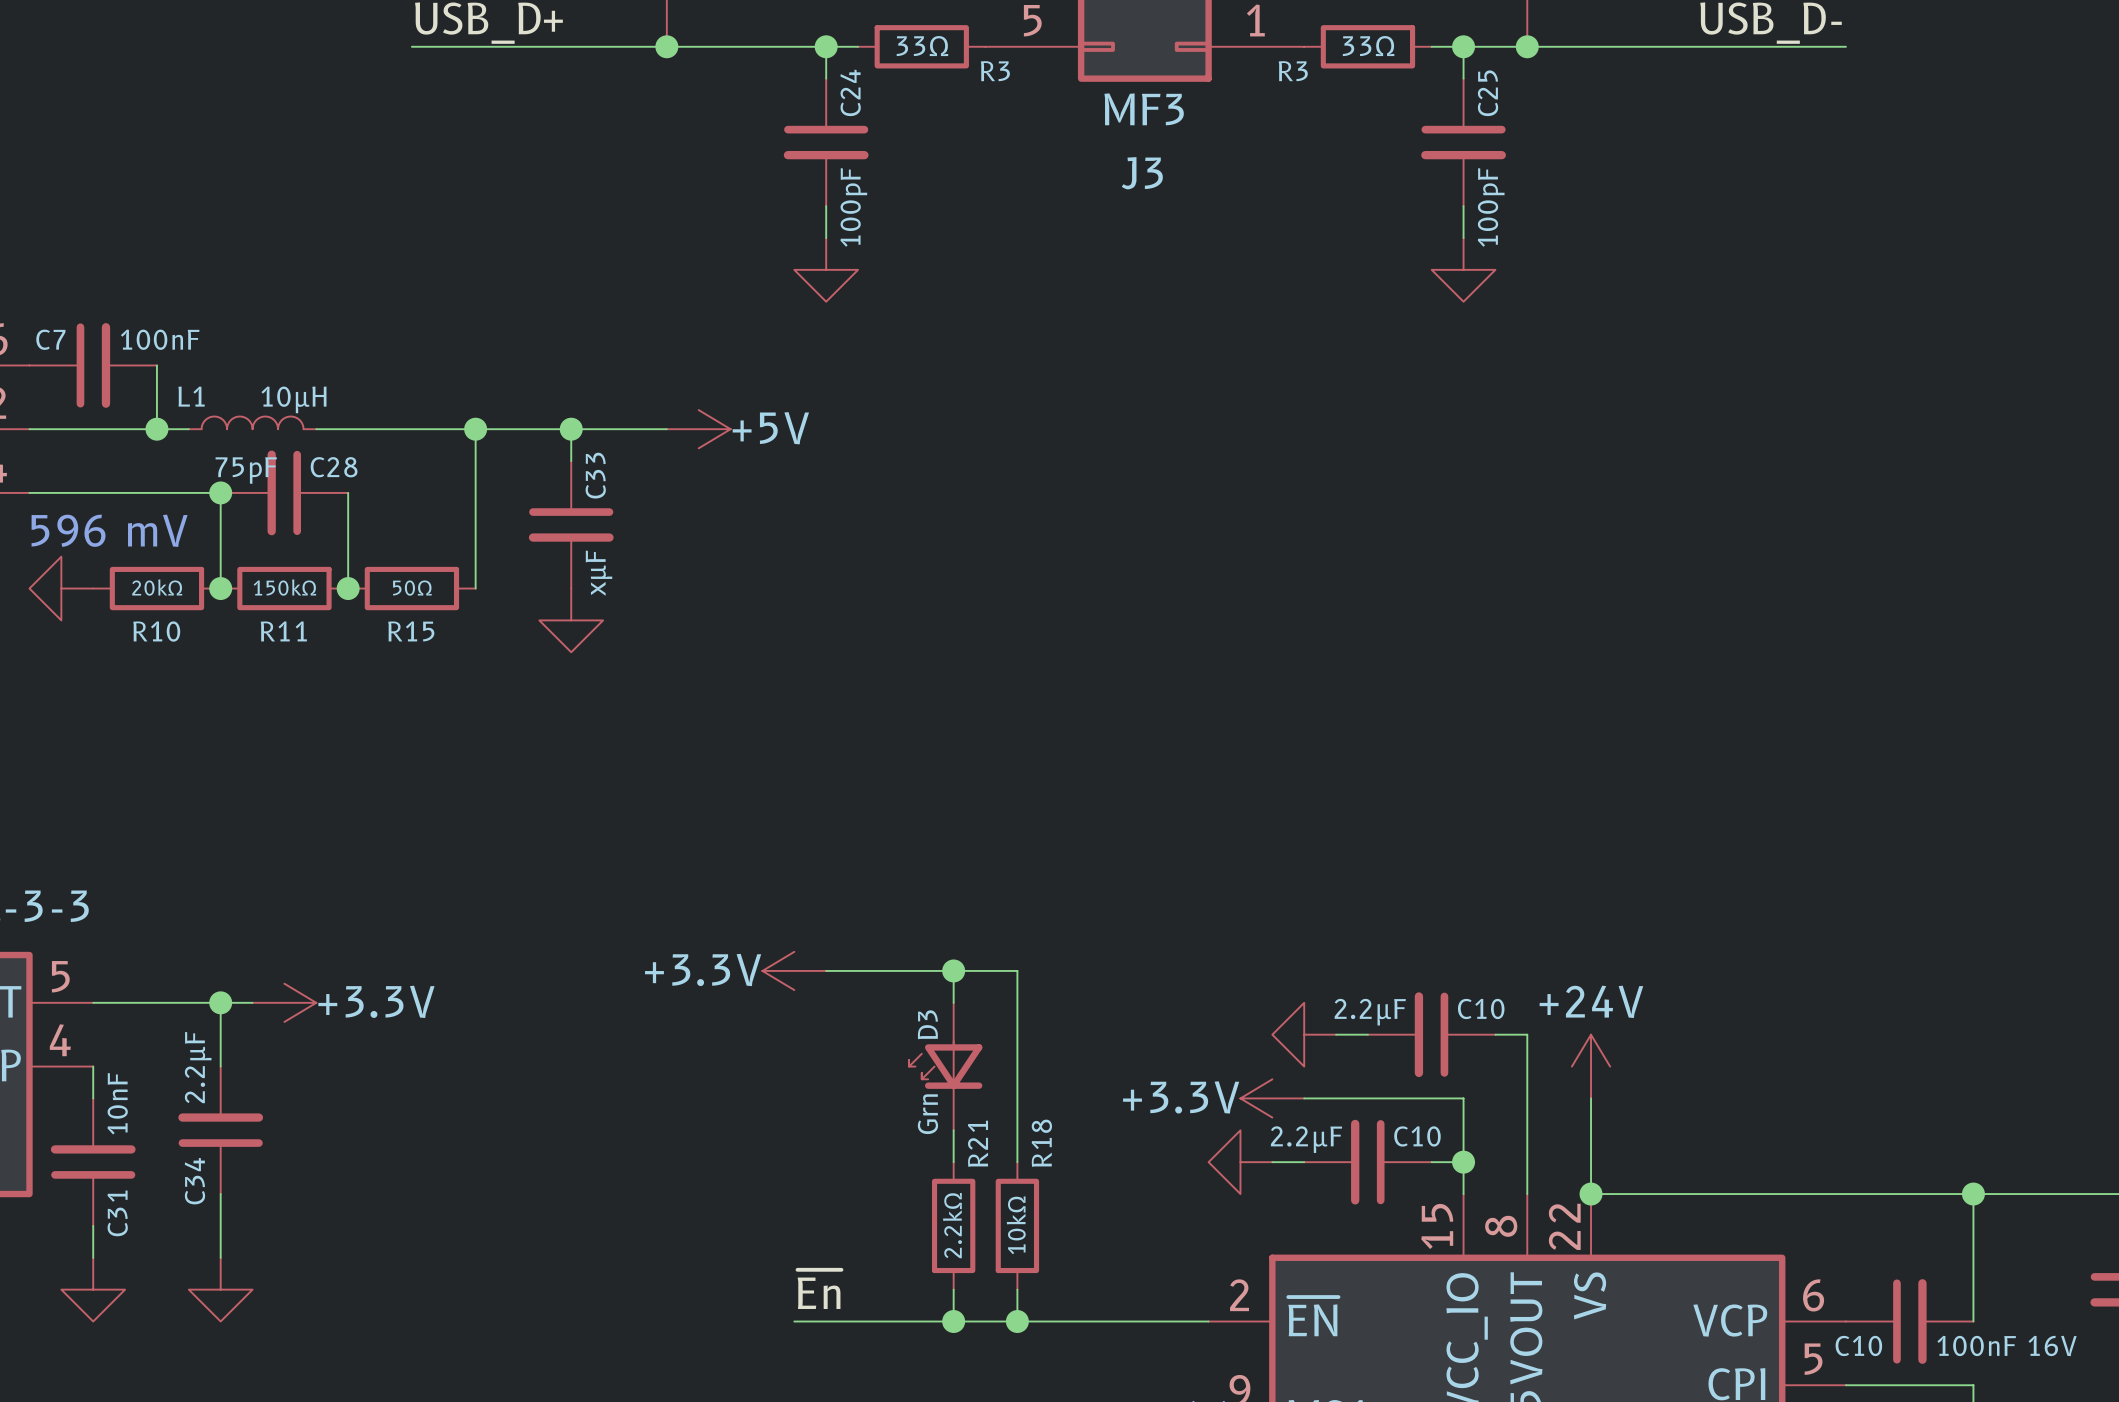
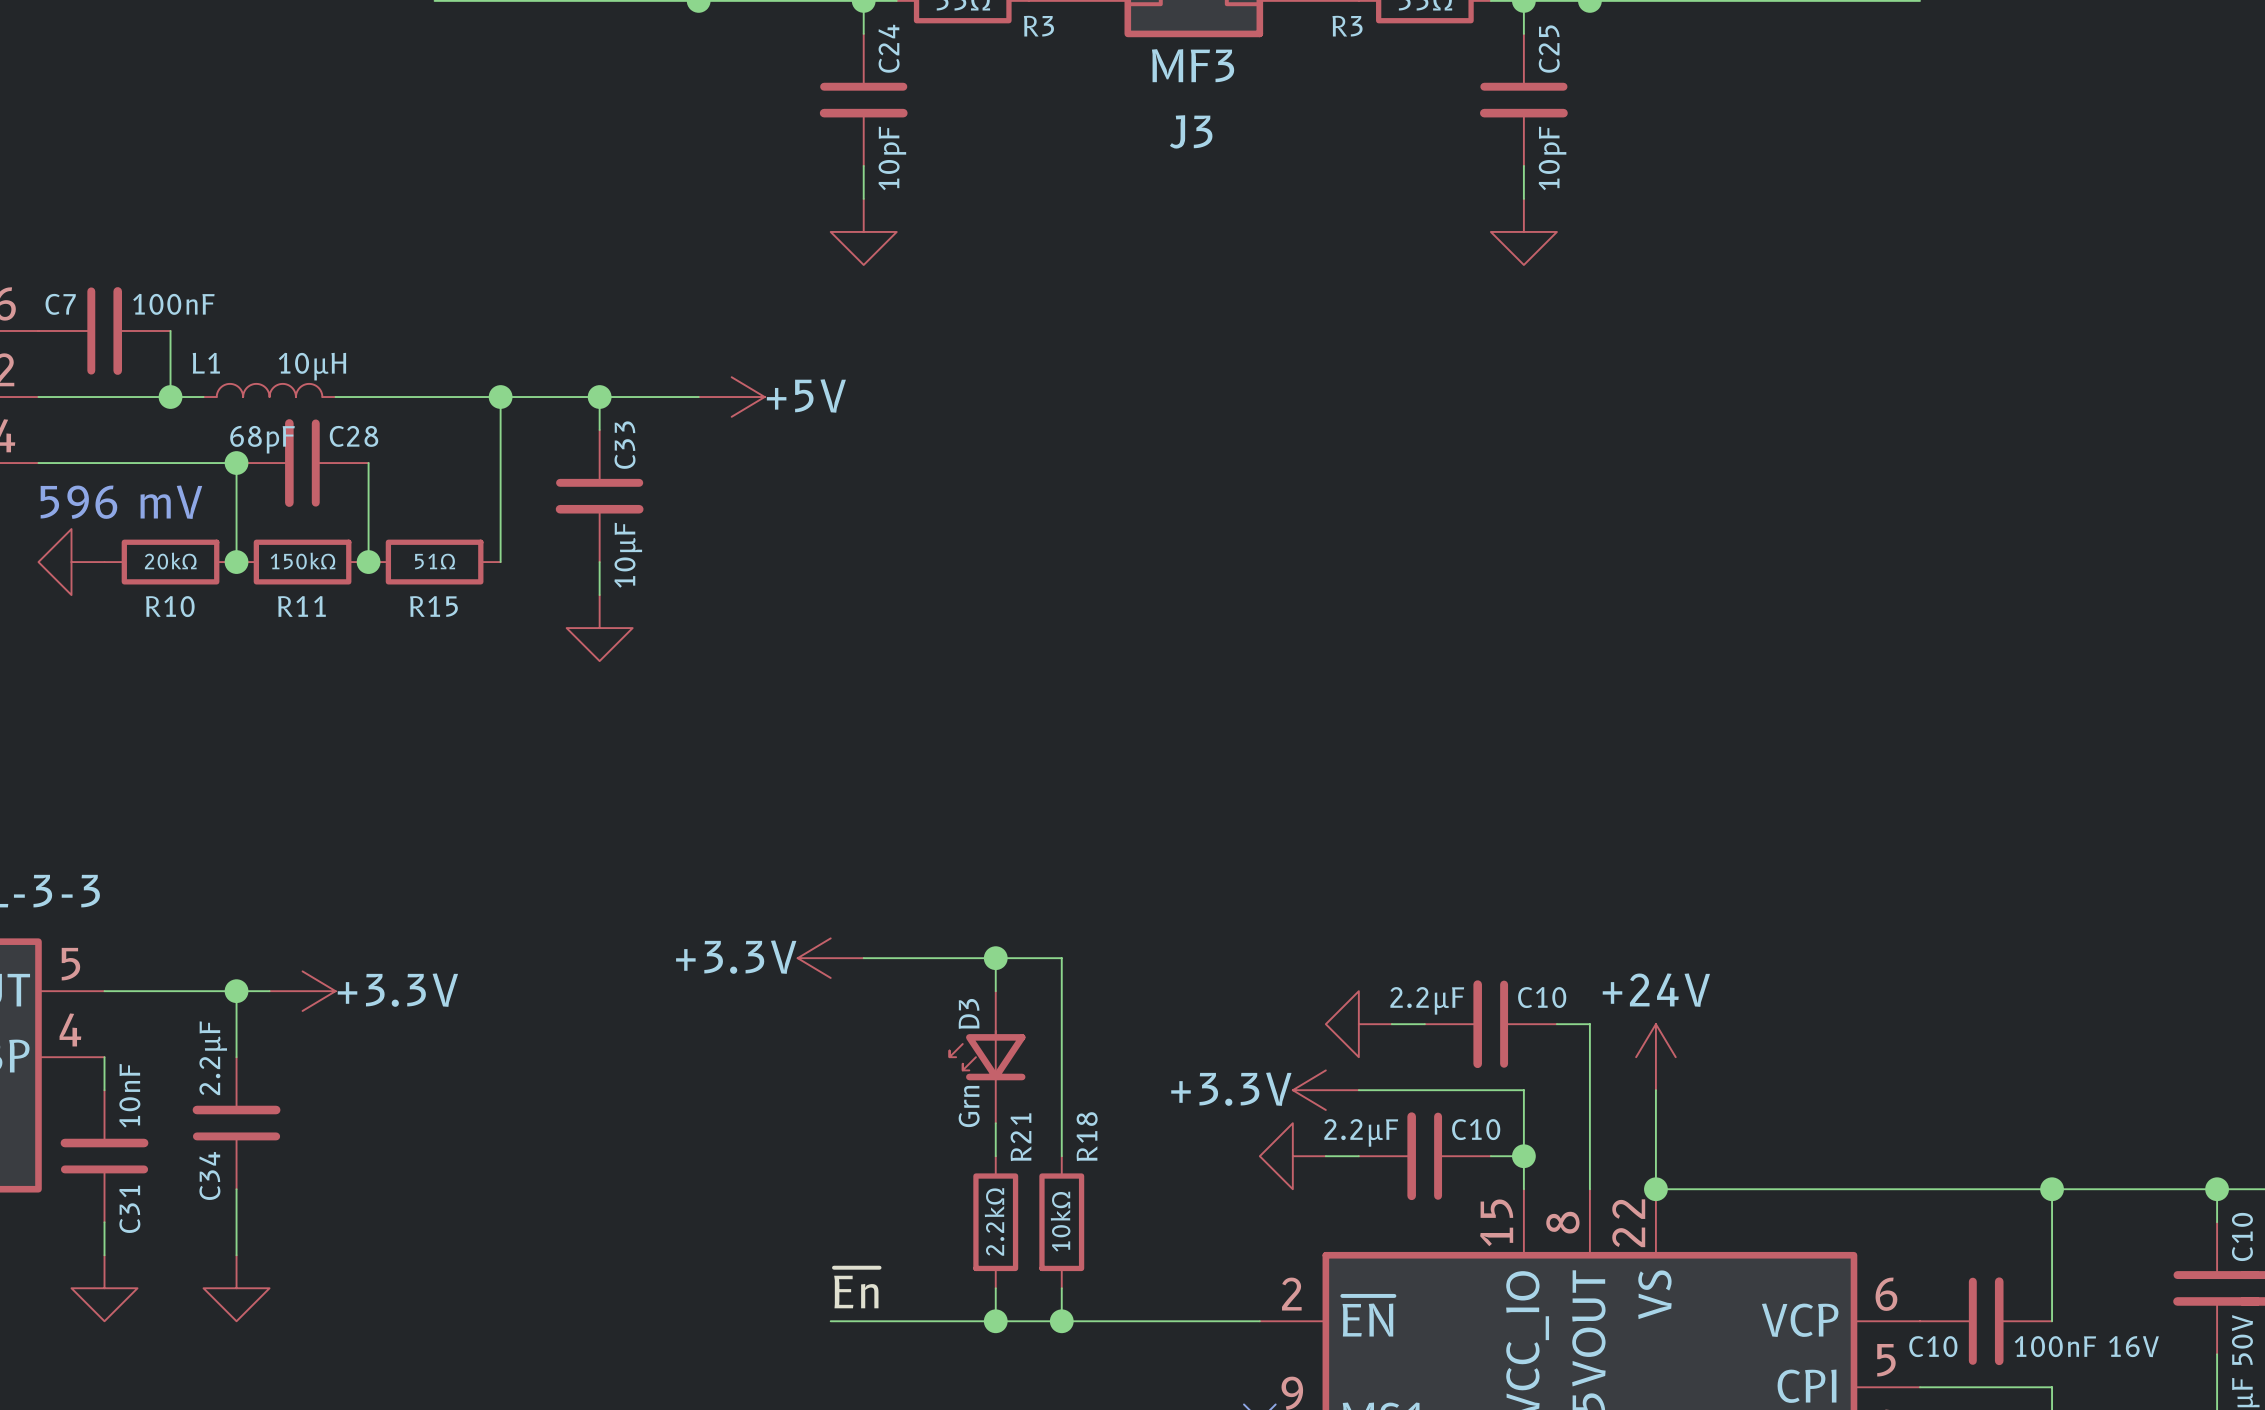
C24 value: 100pF (853, 207) -> 10pF (892, 158)
C25 value: 100pF (1491, 207) -> 10pF (1552, 158)
C28 value: 75pF (246, 470) -> 68pF (262, 439)
C33 value: xµF (599, 573) -> 10µF (628, 555)
R15 value: 50Ω (412, 588) -> 51Ω (435, 561)
power symbol position: (571, 620) -> (599, 628)

